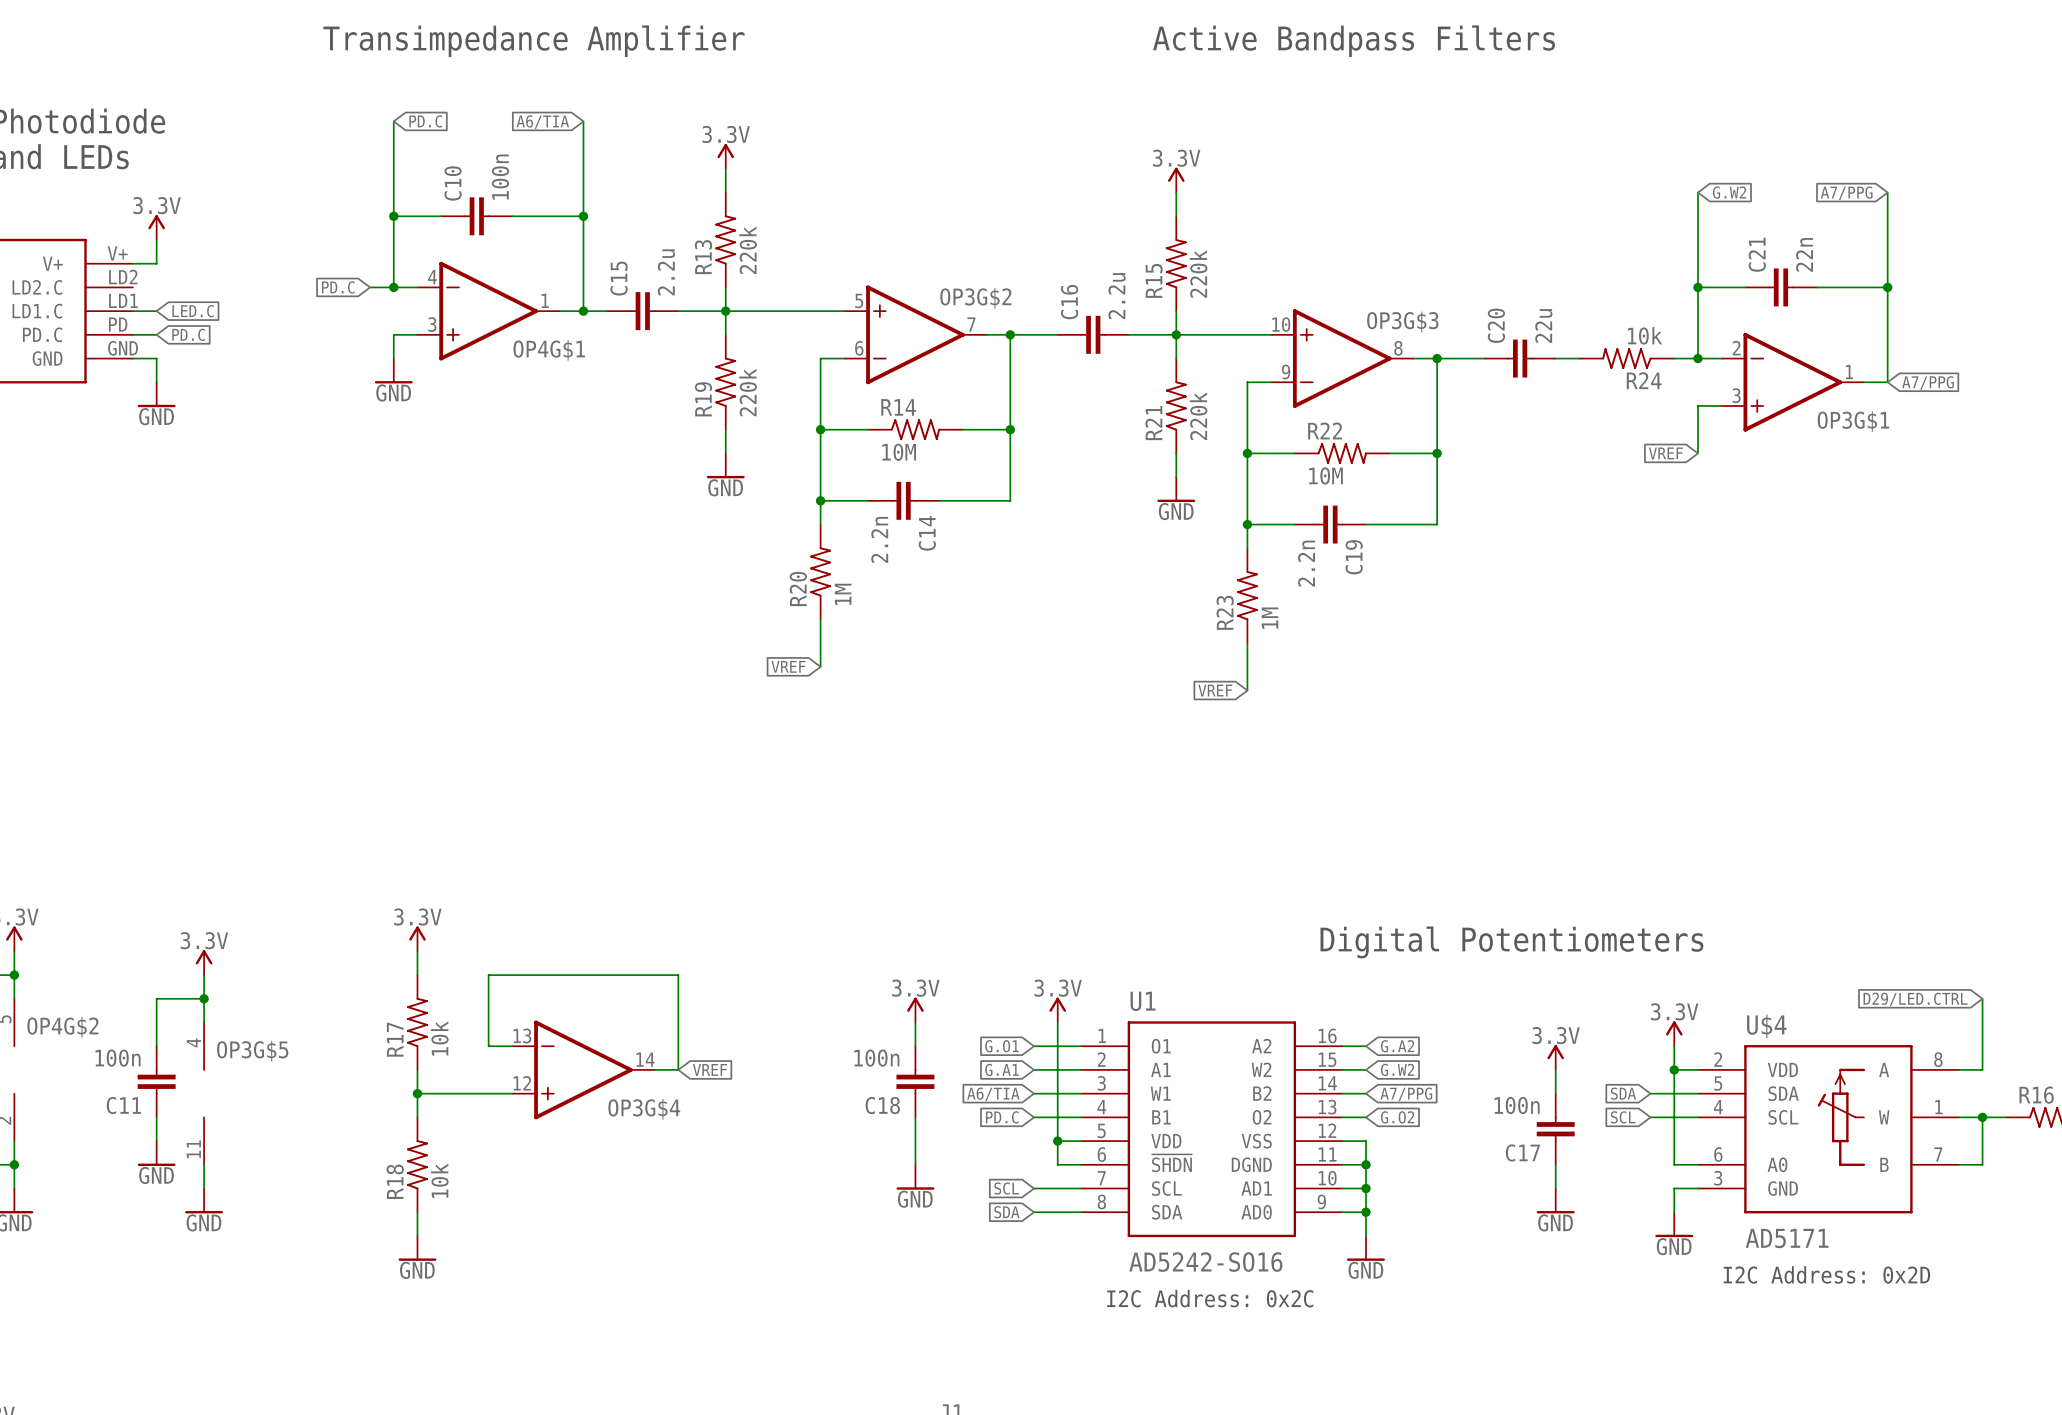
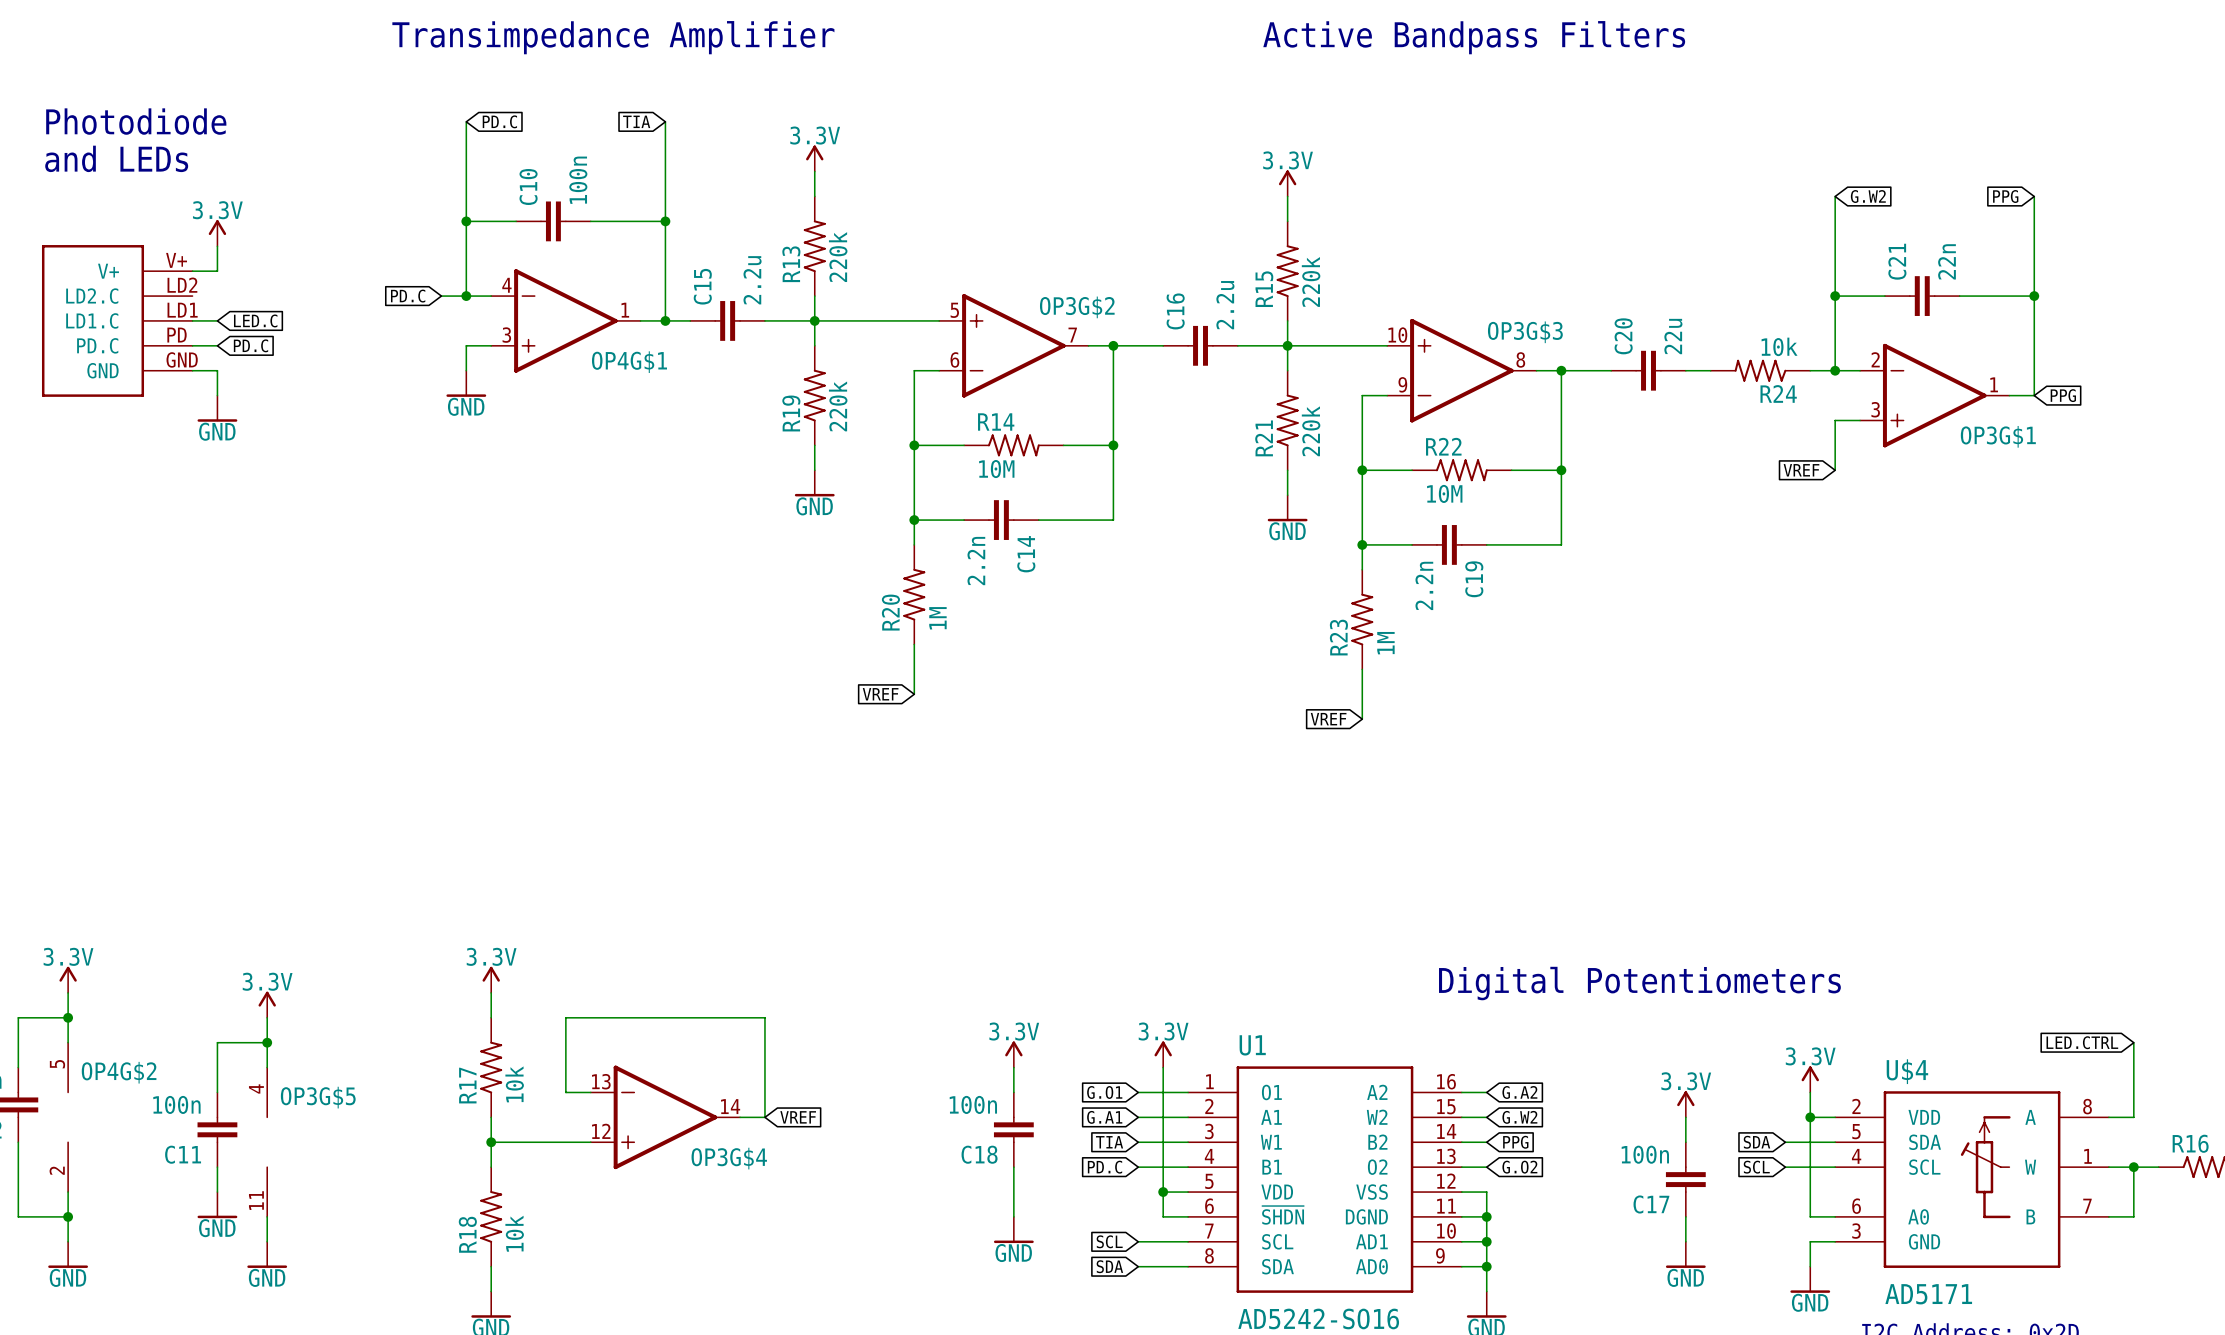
global label: A6/TIA (542, 122) -> TIA (636, 121)
global label: A7/PPG (1846, 193) -> PPG (2005, 196)
global label: A7/PPG (1928, 382) -> PPG (2063, 395)
global label: D29/LED.CTRL (1915, 999) -> LED.CTRL (2082, 1042)
global label: A6/TIA (993, 1094) -> TIA (1109, 1142)
global label: A7/PPG (1406, 1094) -> PPG (1515, 1142)

